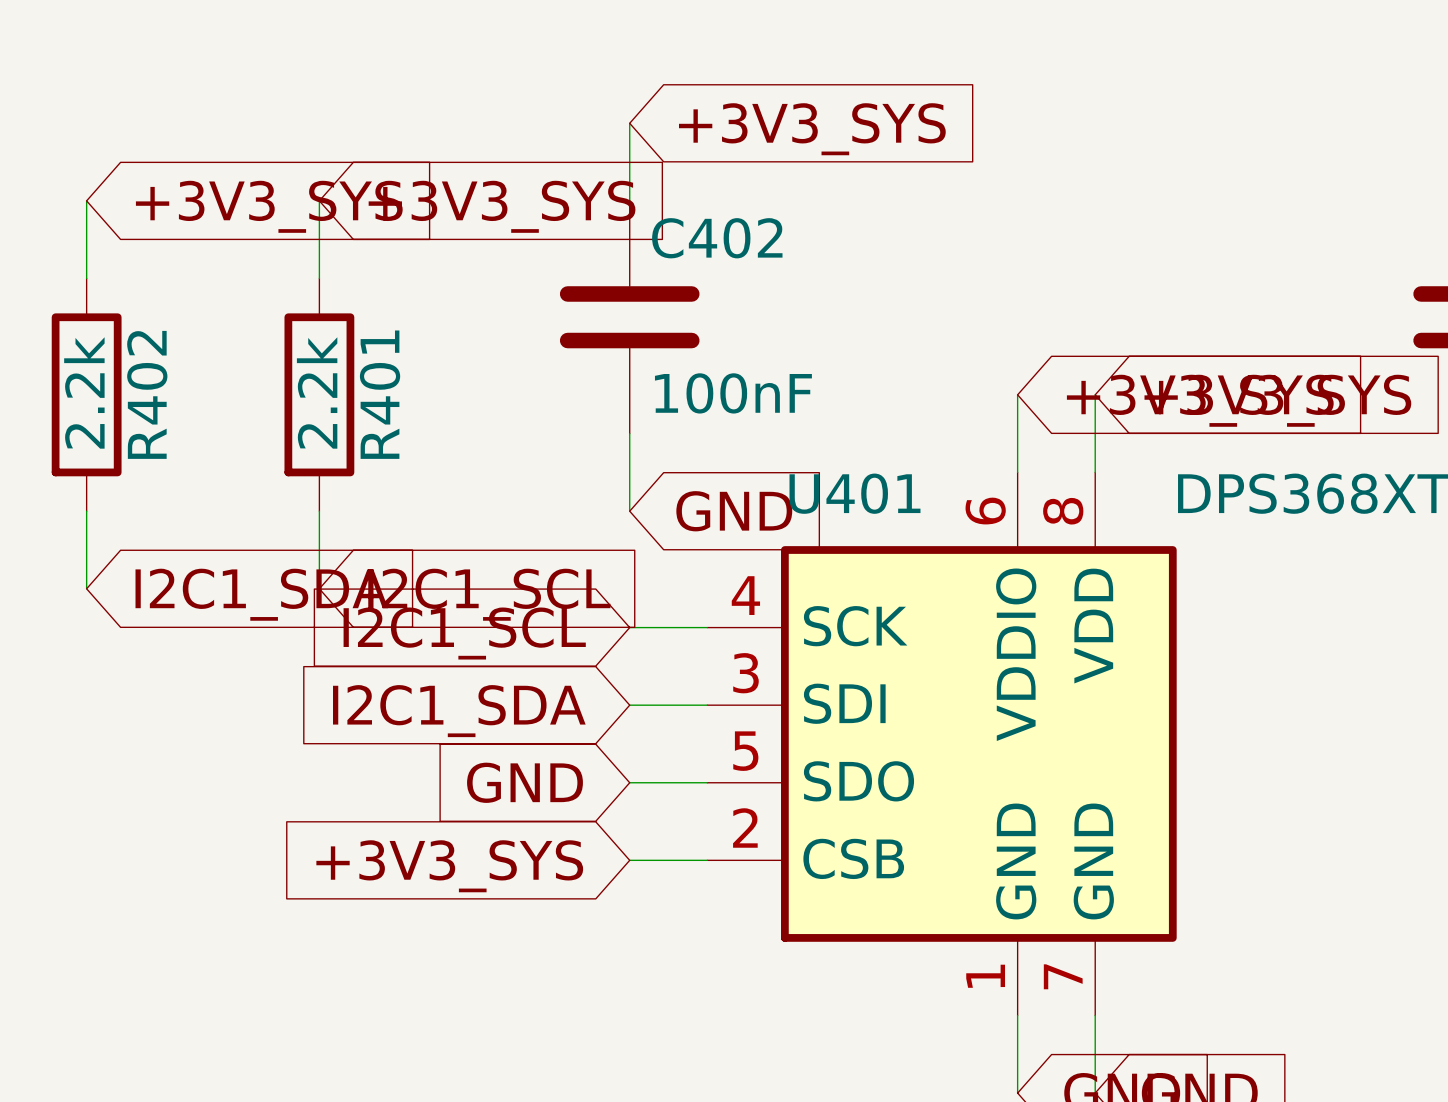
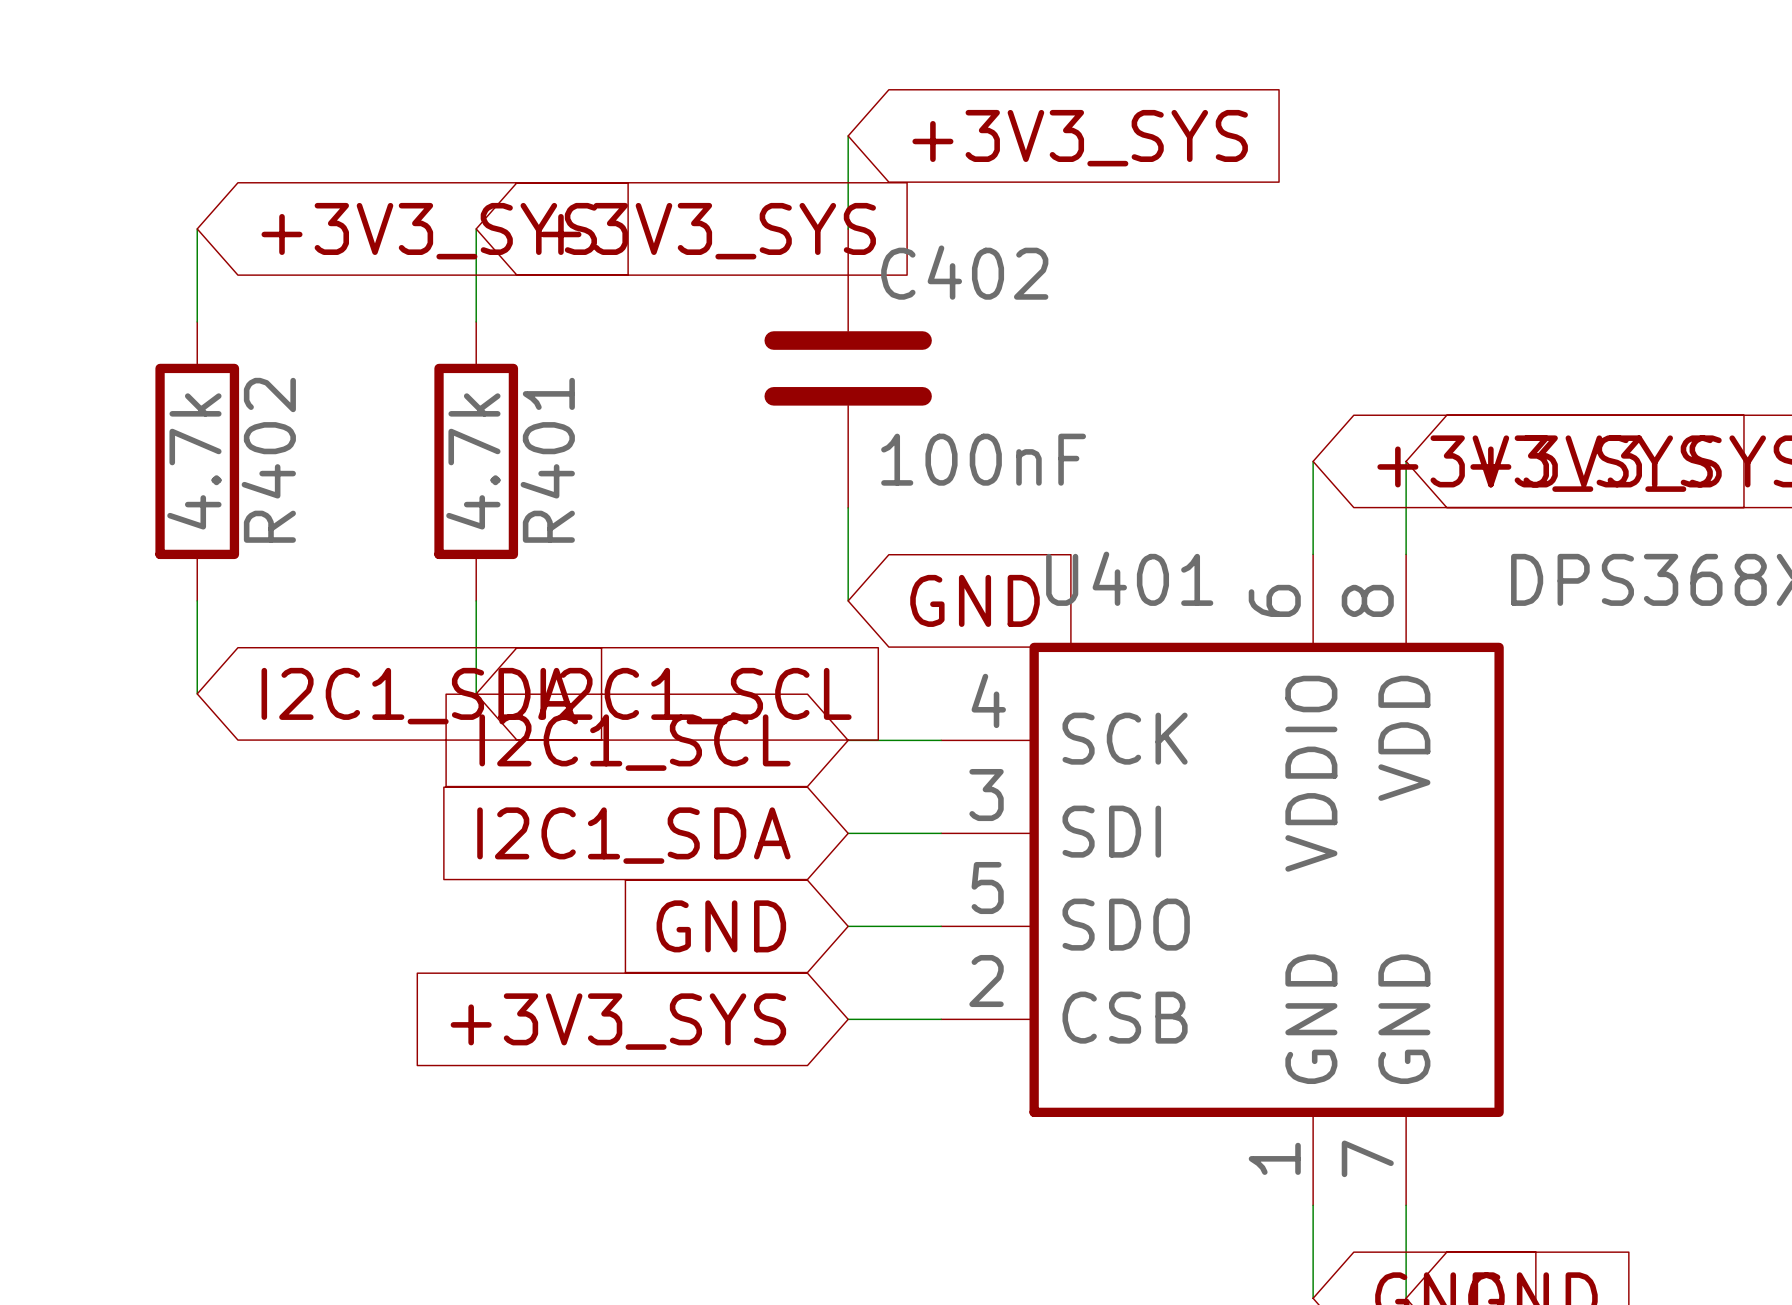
R402 value: 2.2k (84, 392) -> 4.7k (194, 461)
R401 value: 2.2k (317, 392) -> 4.7k (473, 461)

